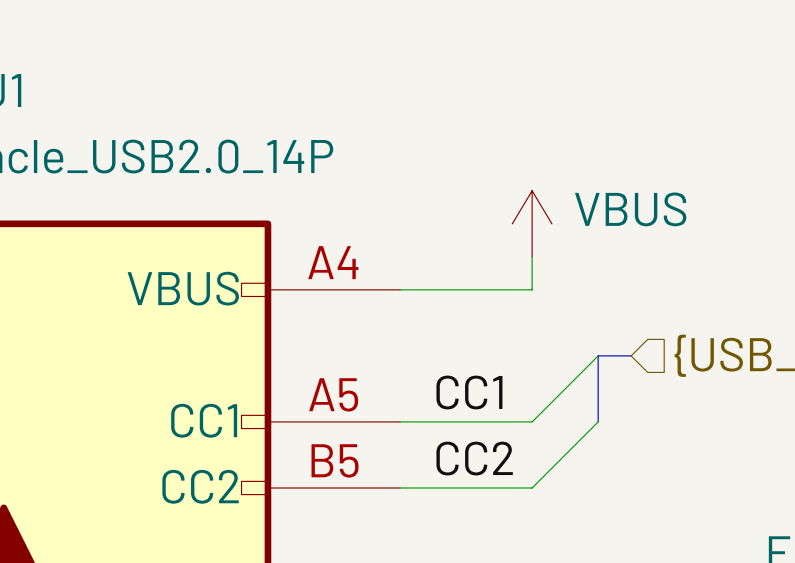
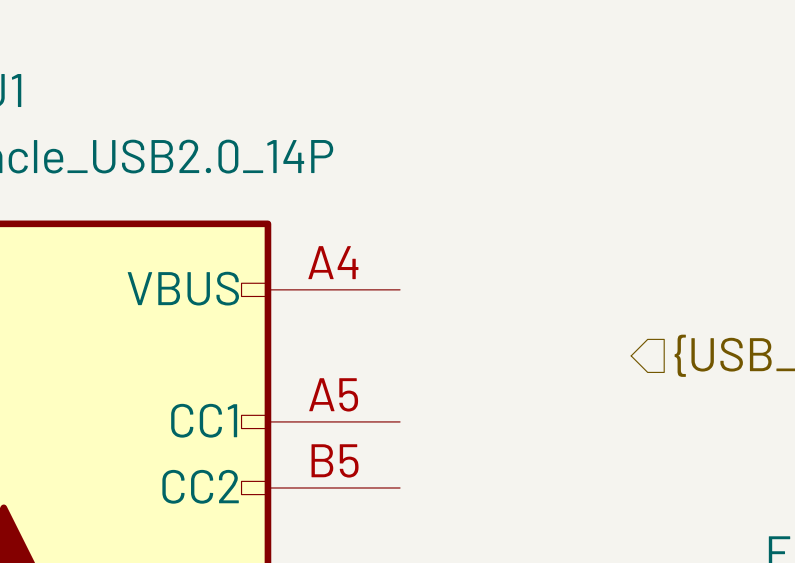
power symbol: VBUS (532, 223) -> none
wire: (532, 256) (532, 289) (400, 289) -> none
wire: (598, 355) (532, 421) (400, 421) -> none
bus: (631, 355) (598, 355) (598, 421) -> none
label: CC1 (469, 392) -> none
wire: (598, 421) (532, 487) (400, 487) -> none
label: CC2 (474, 458) -> none

